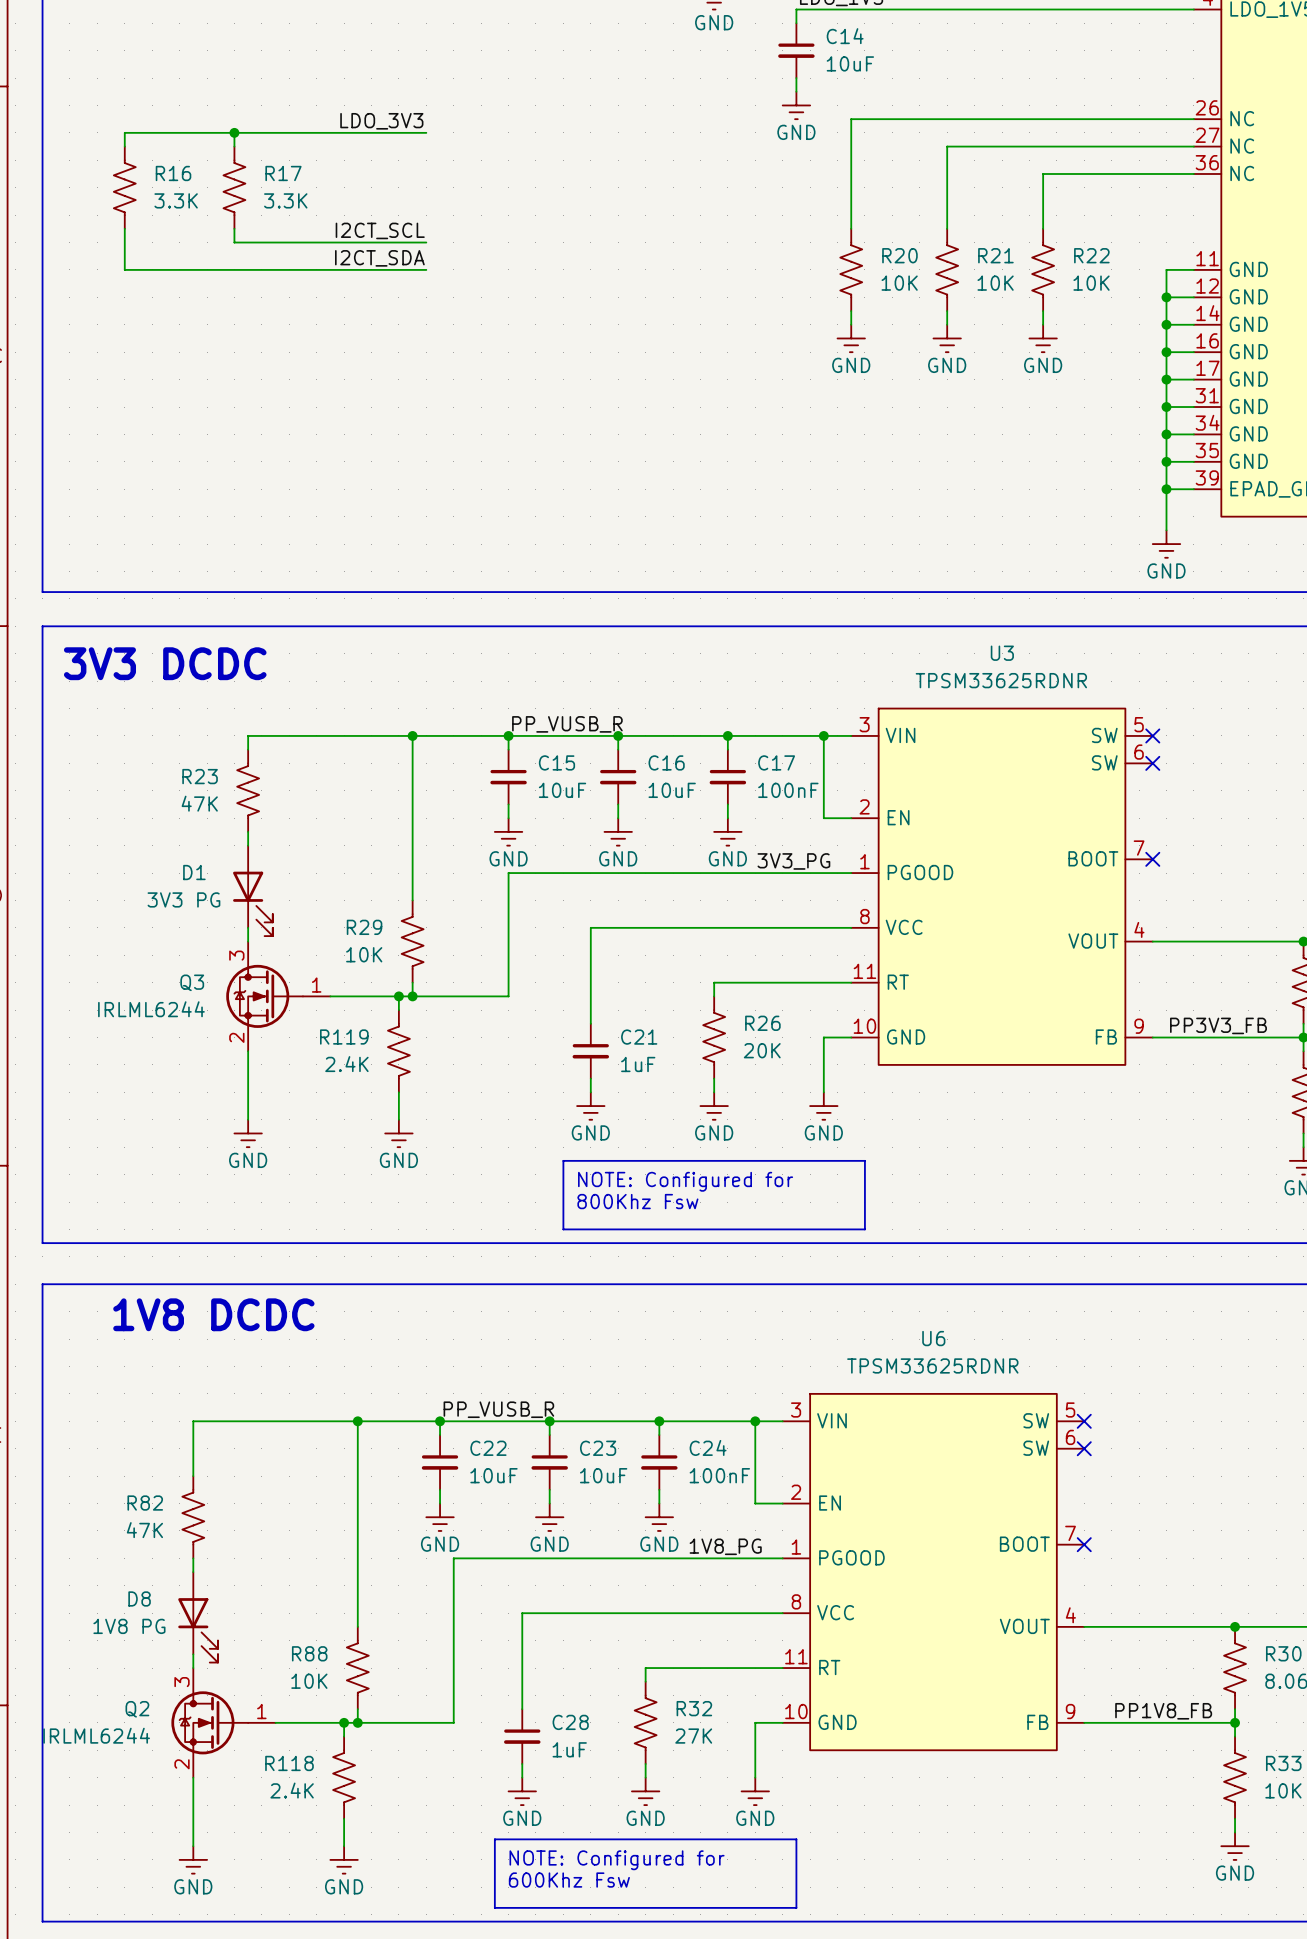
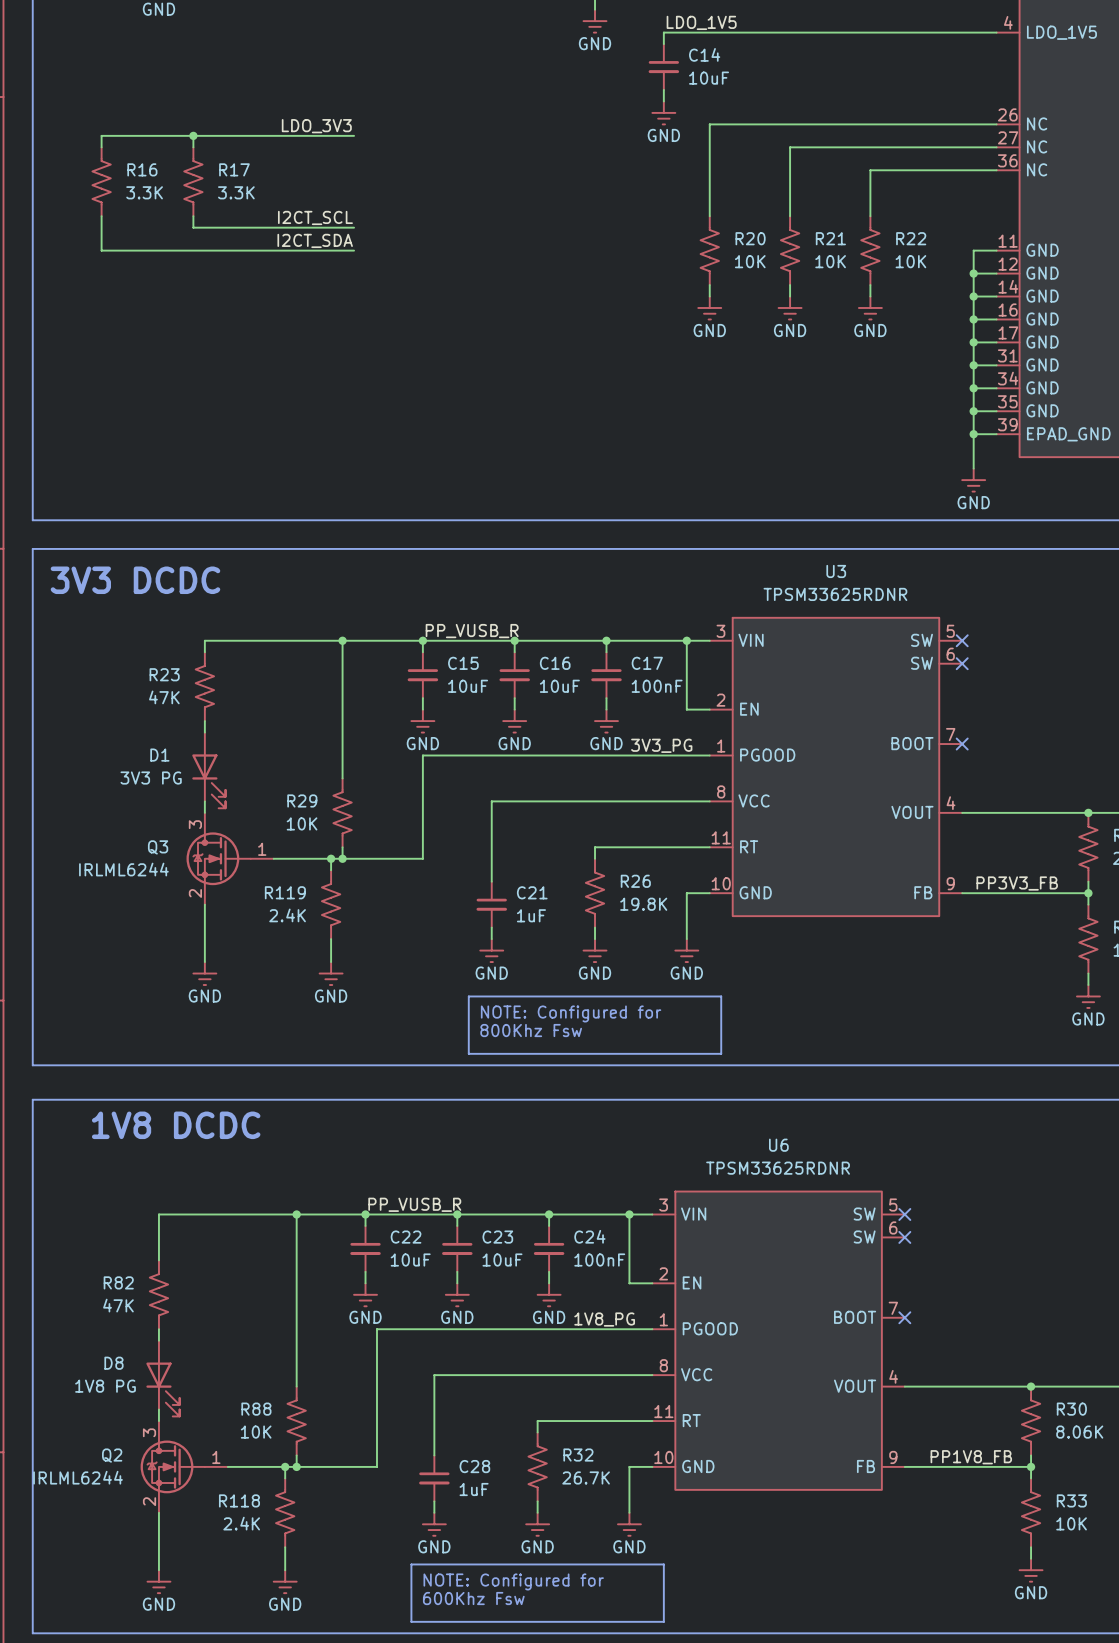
R26 value: 20K (762, 1050) -> 19.8K (643, 904)
R32 value: 27K (693, 1736) -> 26.7K (586, 1477)

